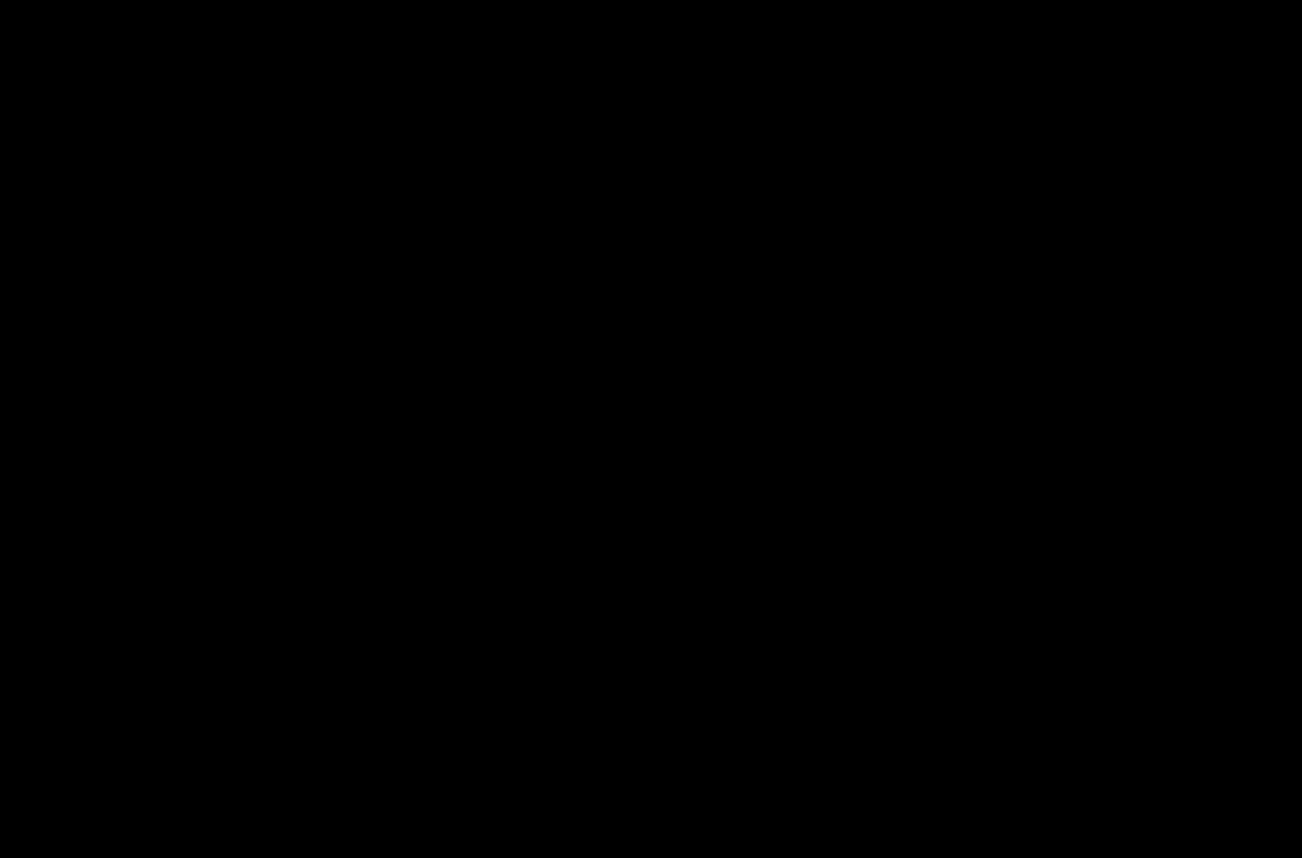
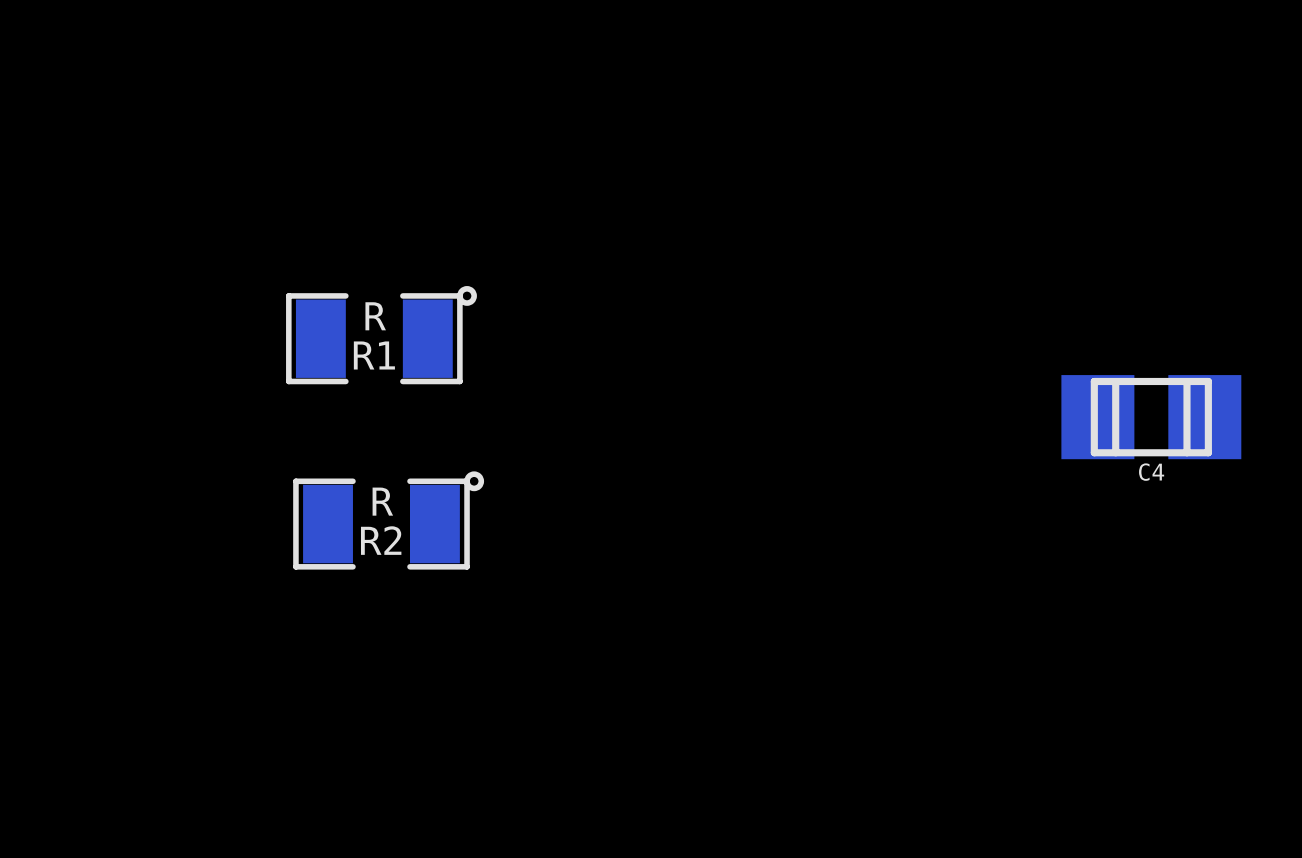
R1: none -> R (381, 335)
C4: none -> (1151, 417)
R2: none -> R (388, 520)

